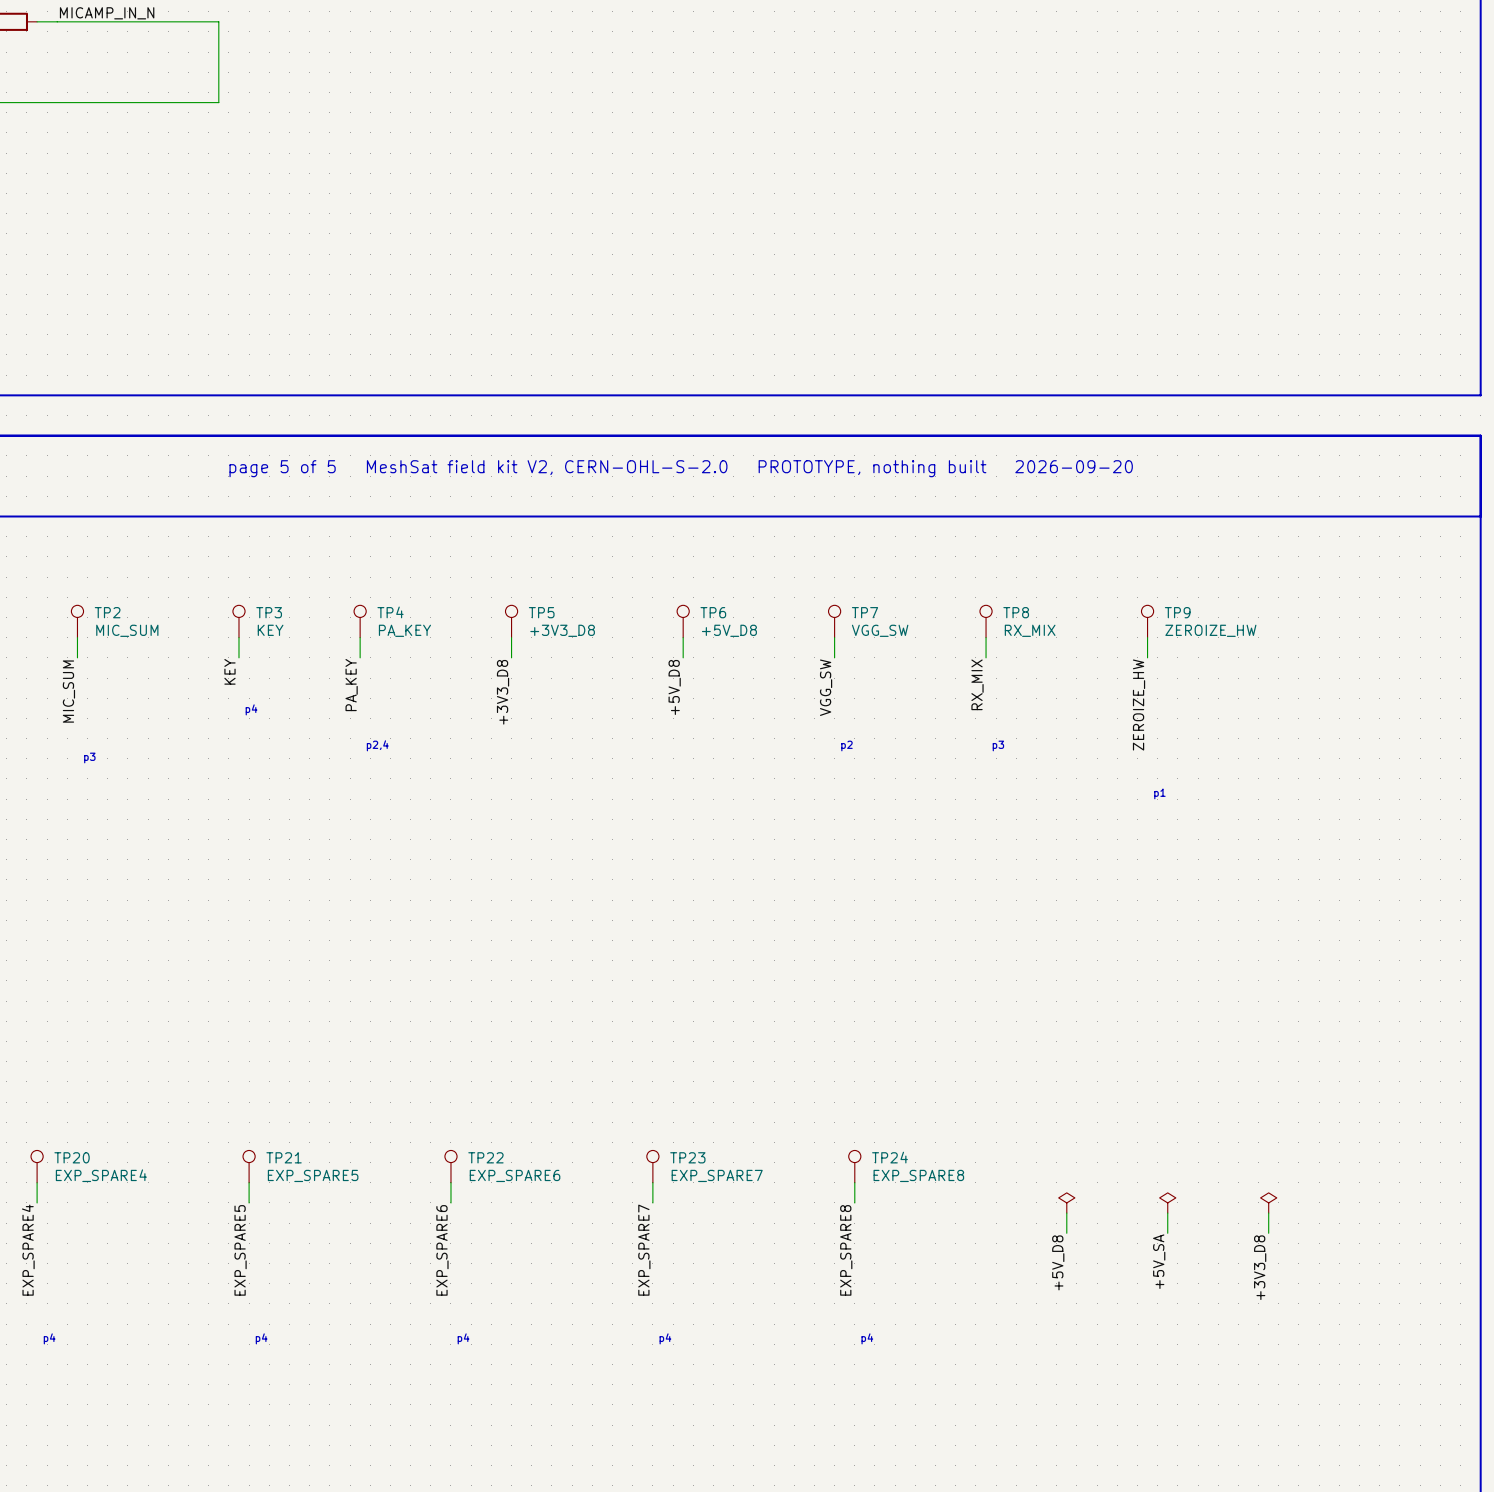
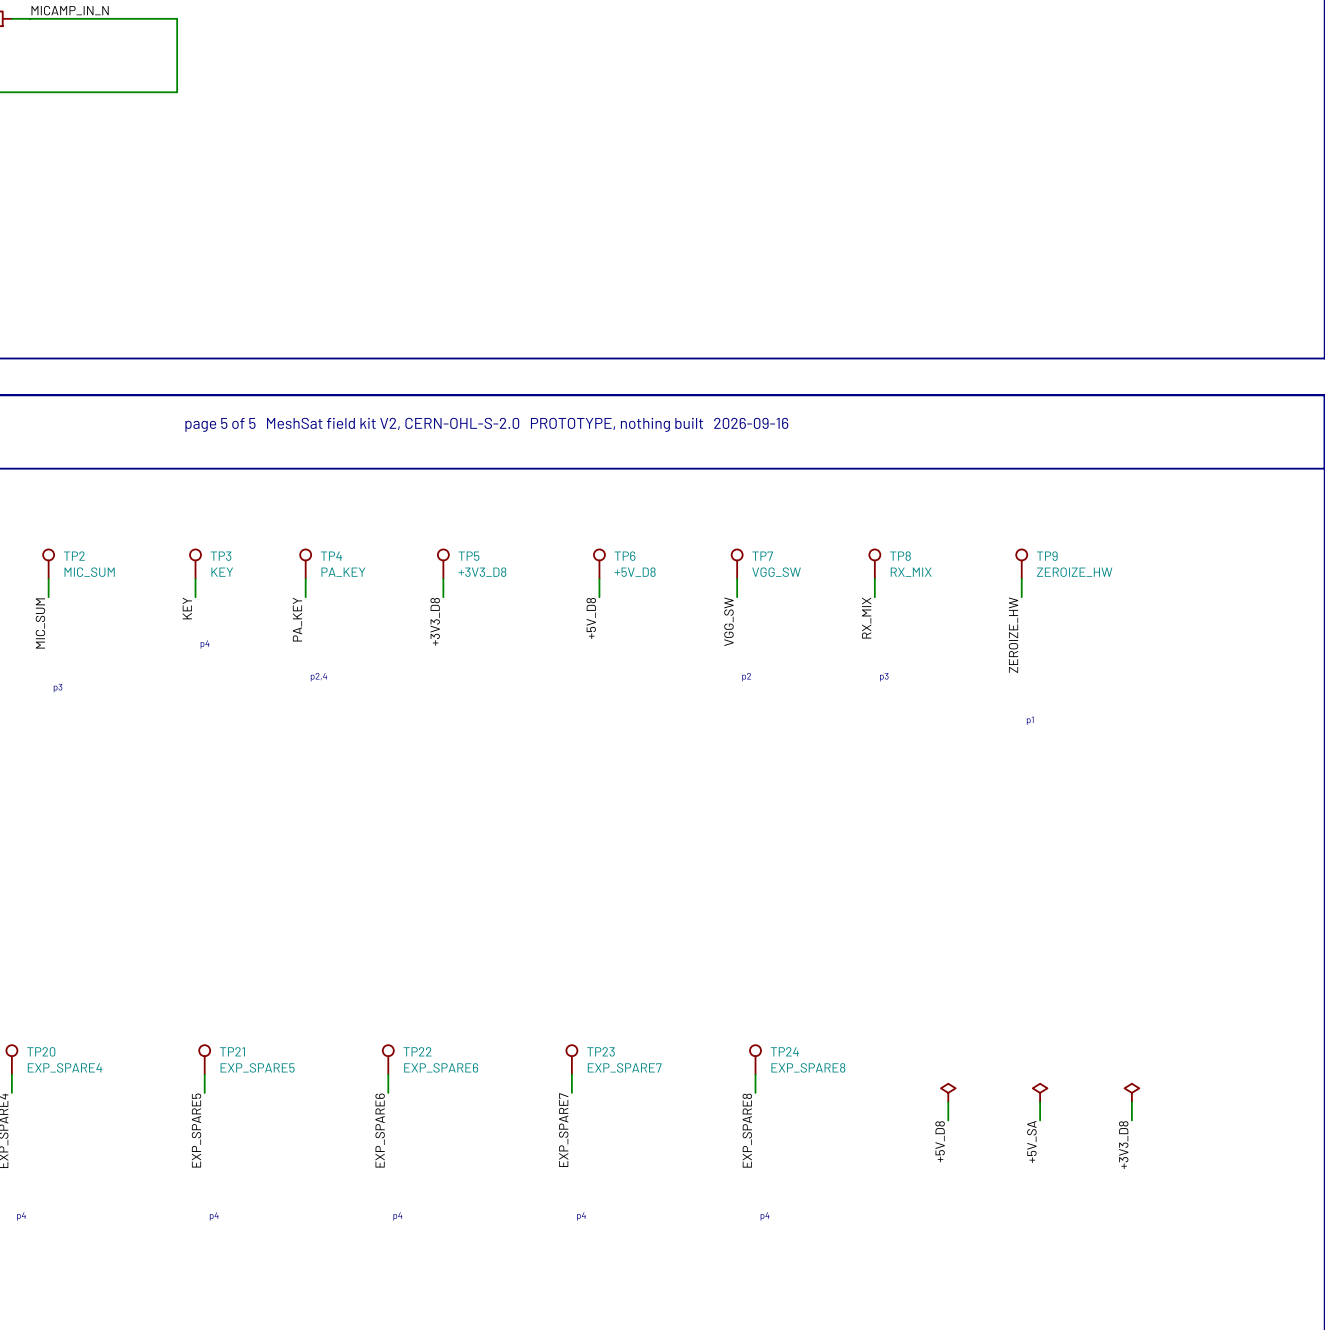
text: page 5 of 5 MeshSat field kit V2, CERN-OHL-S-2.0 PROTOTYPE, nothing built 2026-09-20 (681, 468) -> page 5 of 5 MeshSat field kit V2, CERN-OHL-S-2.0 PROTOTYPE, nothing built 2026-09-16 (486, 424)

